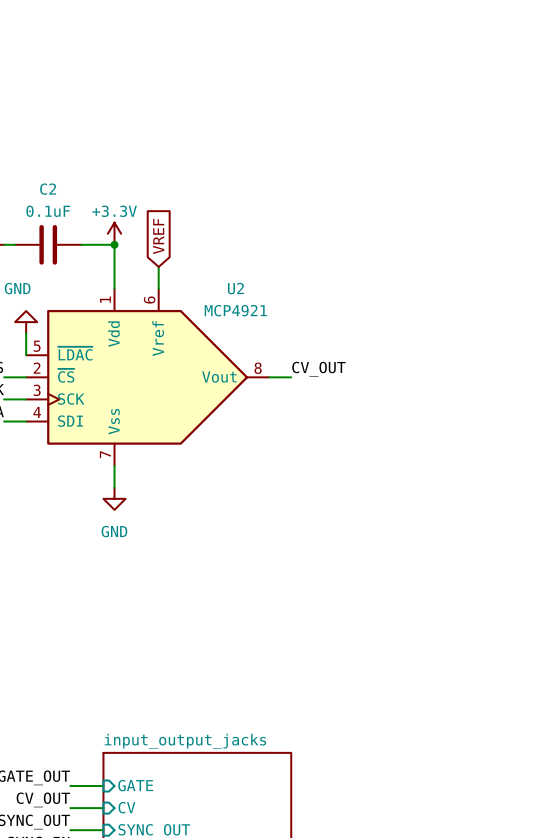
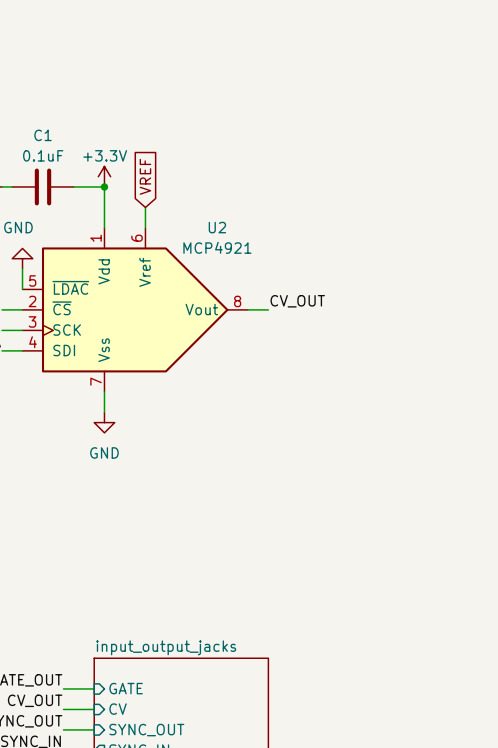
C2 name: C2 (48, 189) -> C1 (43, 135)

